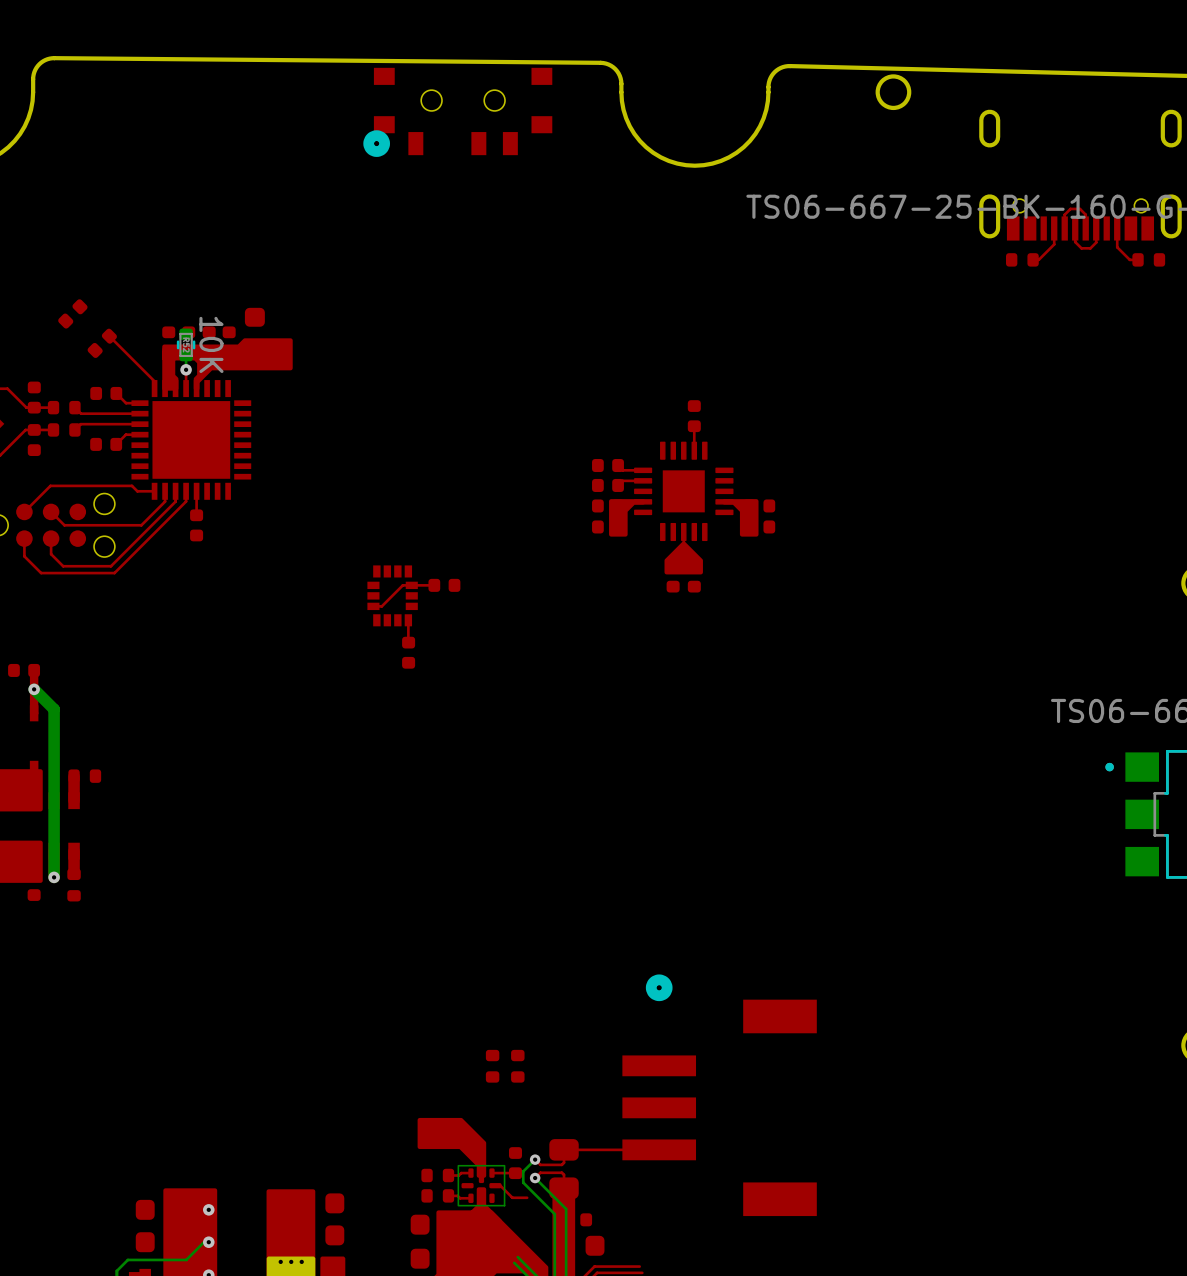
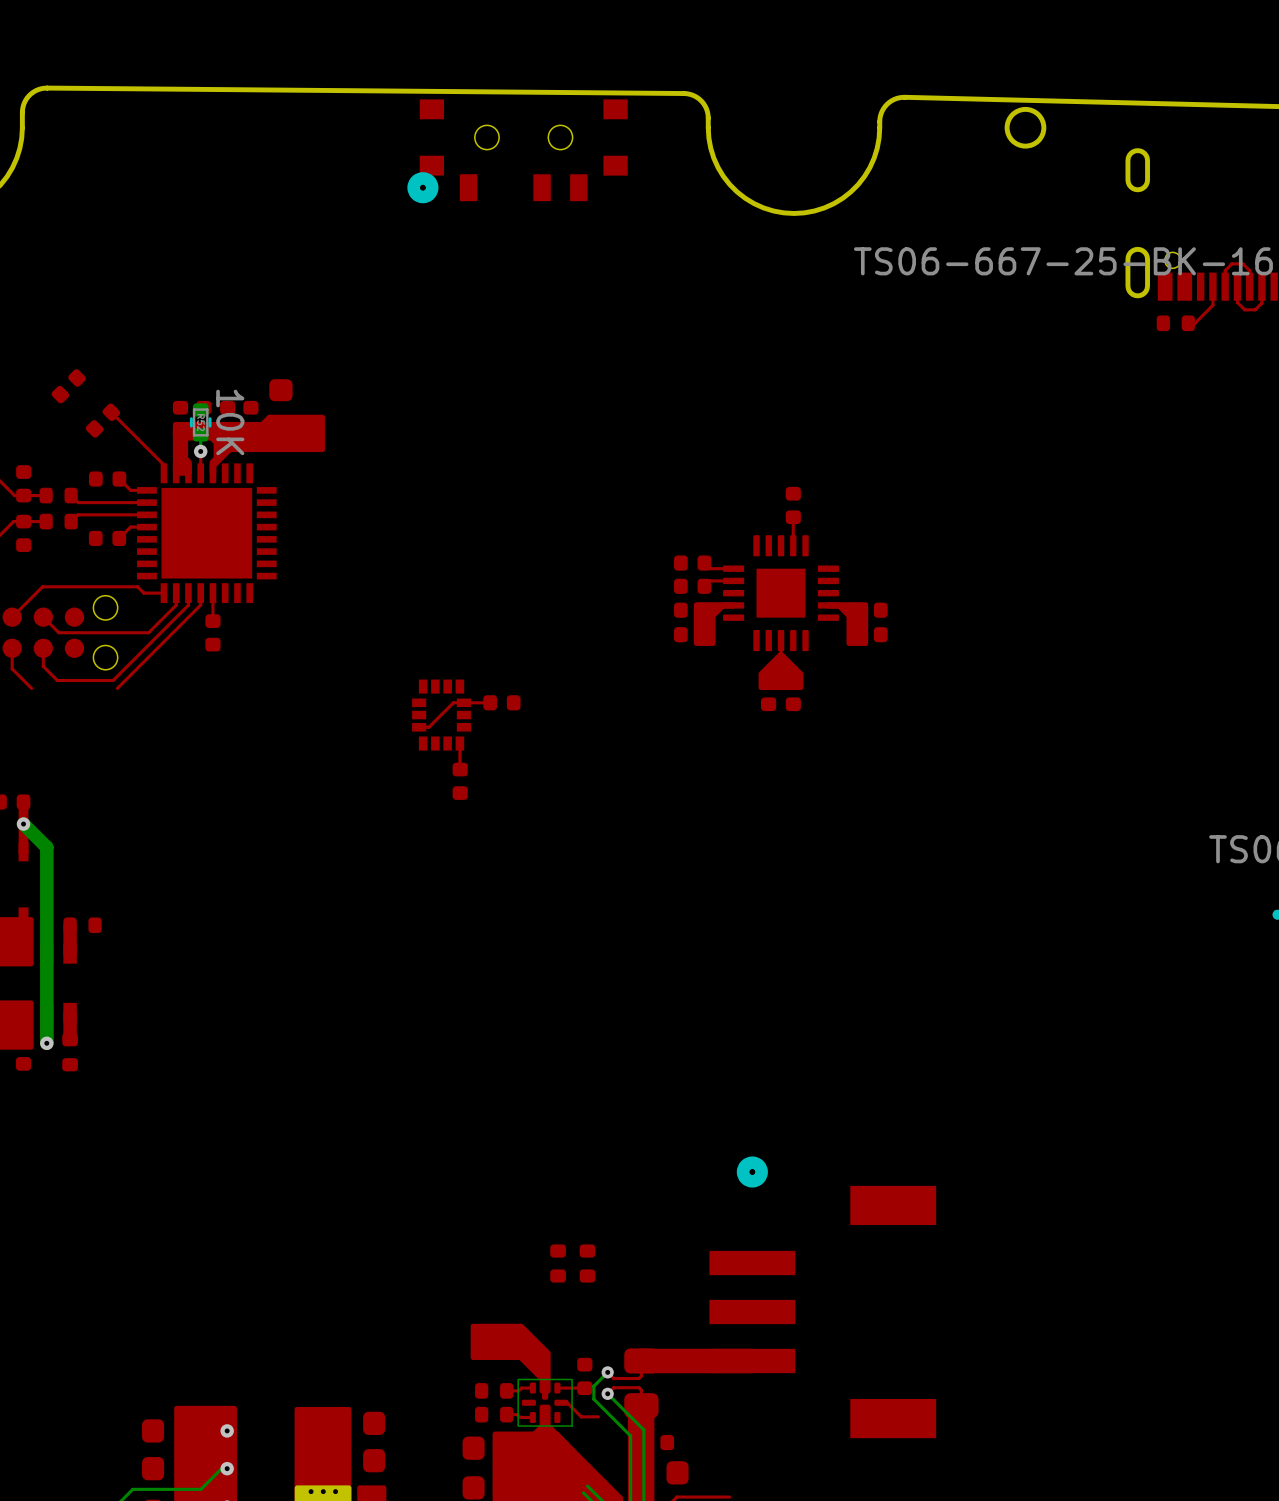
top track: (114, 573) (41, 573) -> none
top track width: thin (659, 1149) (564, 1149) -> thick (752, 1361) (641, 1361)

